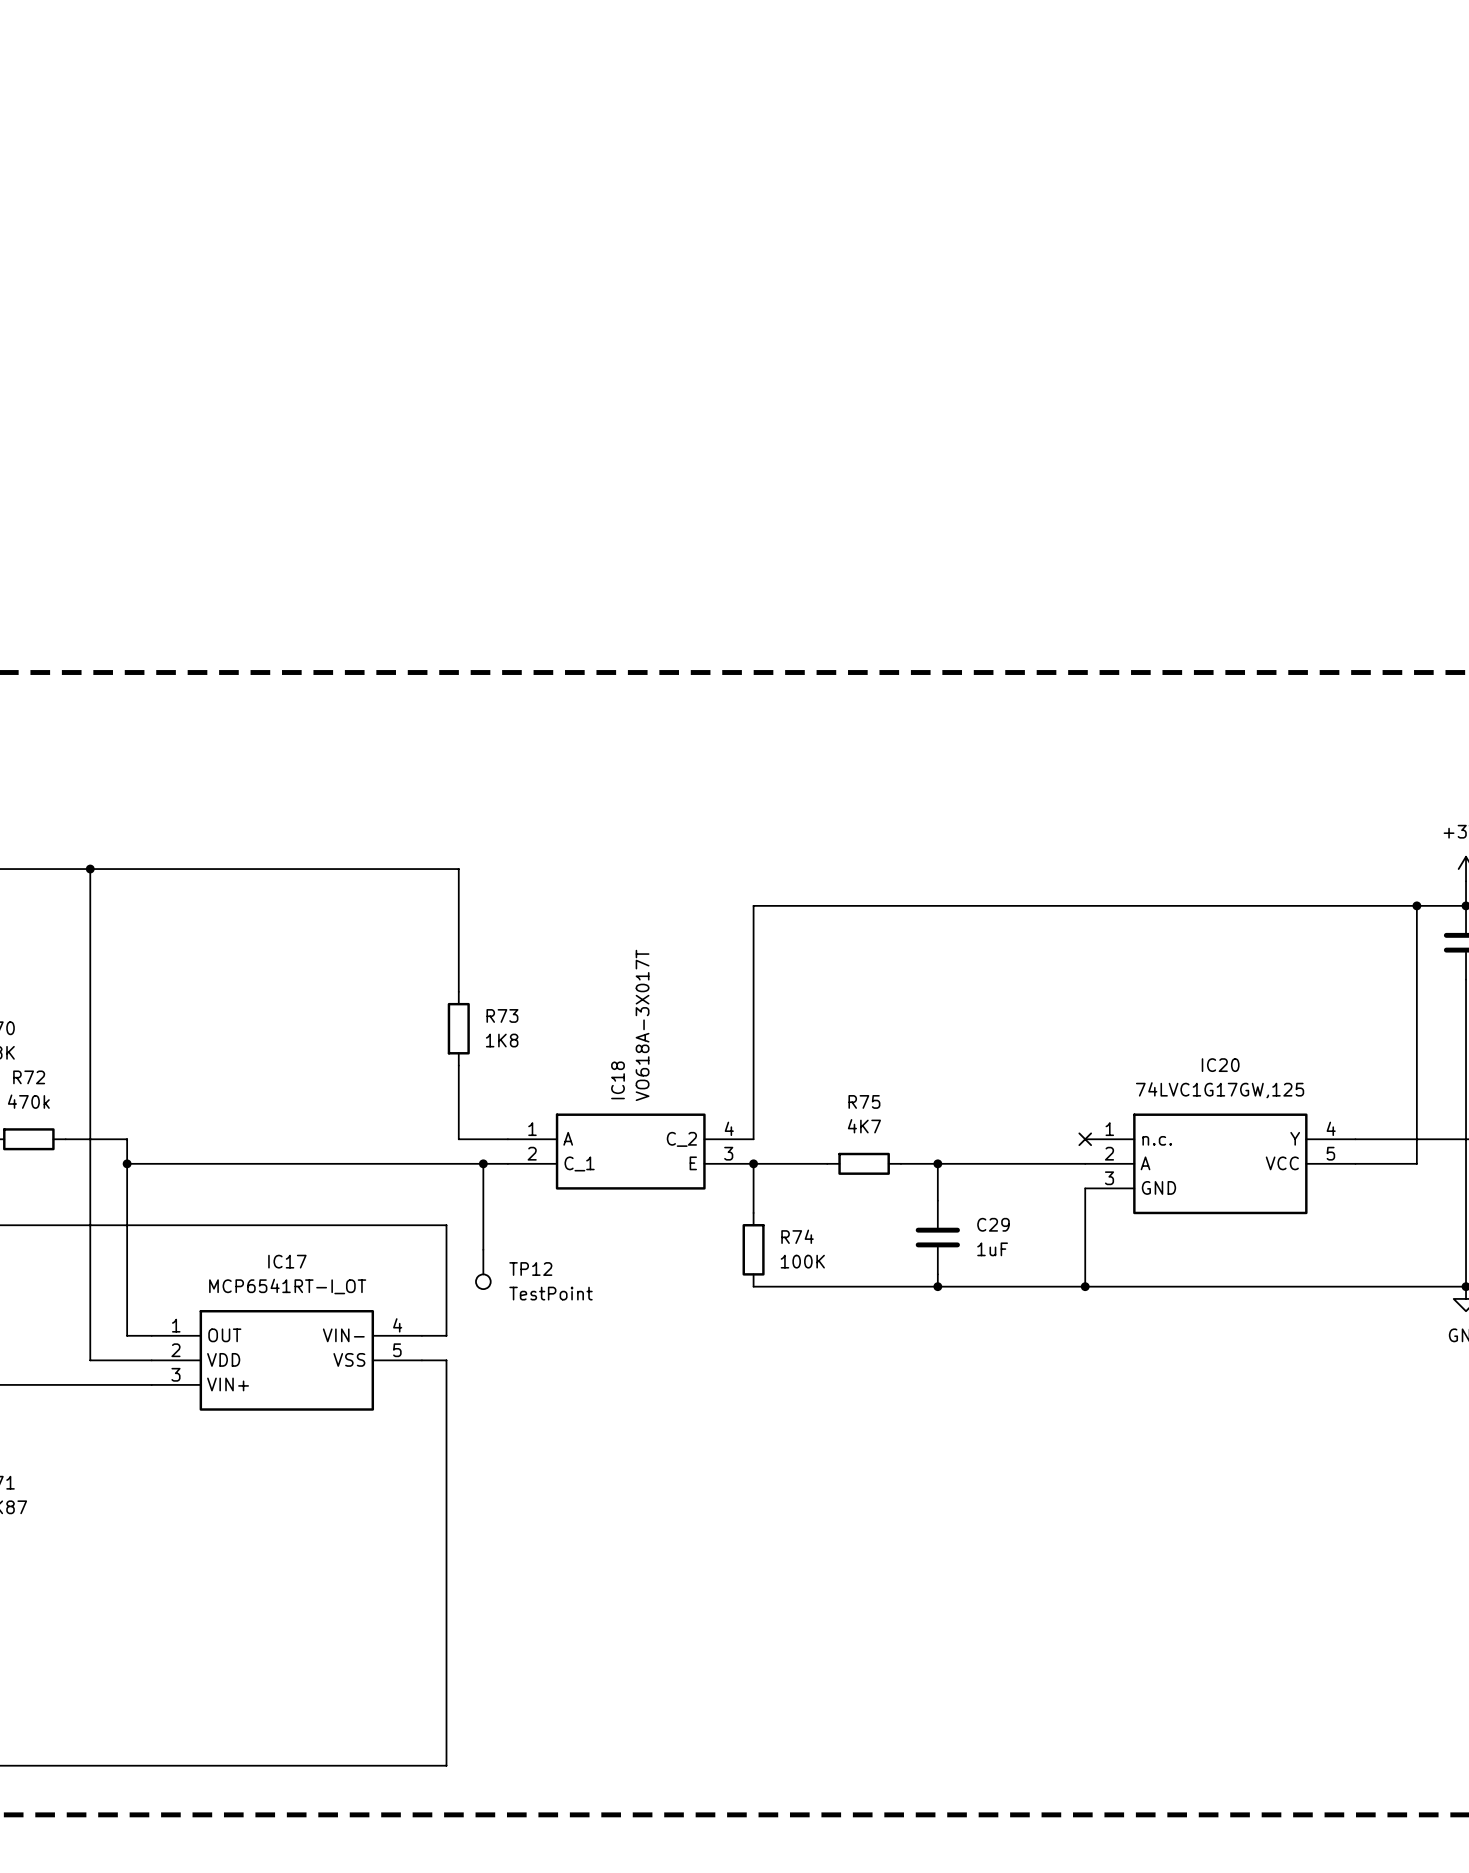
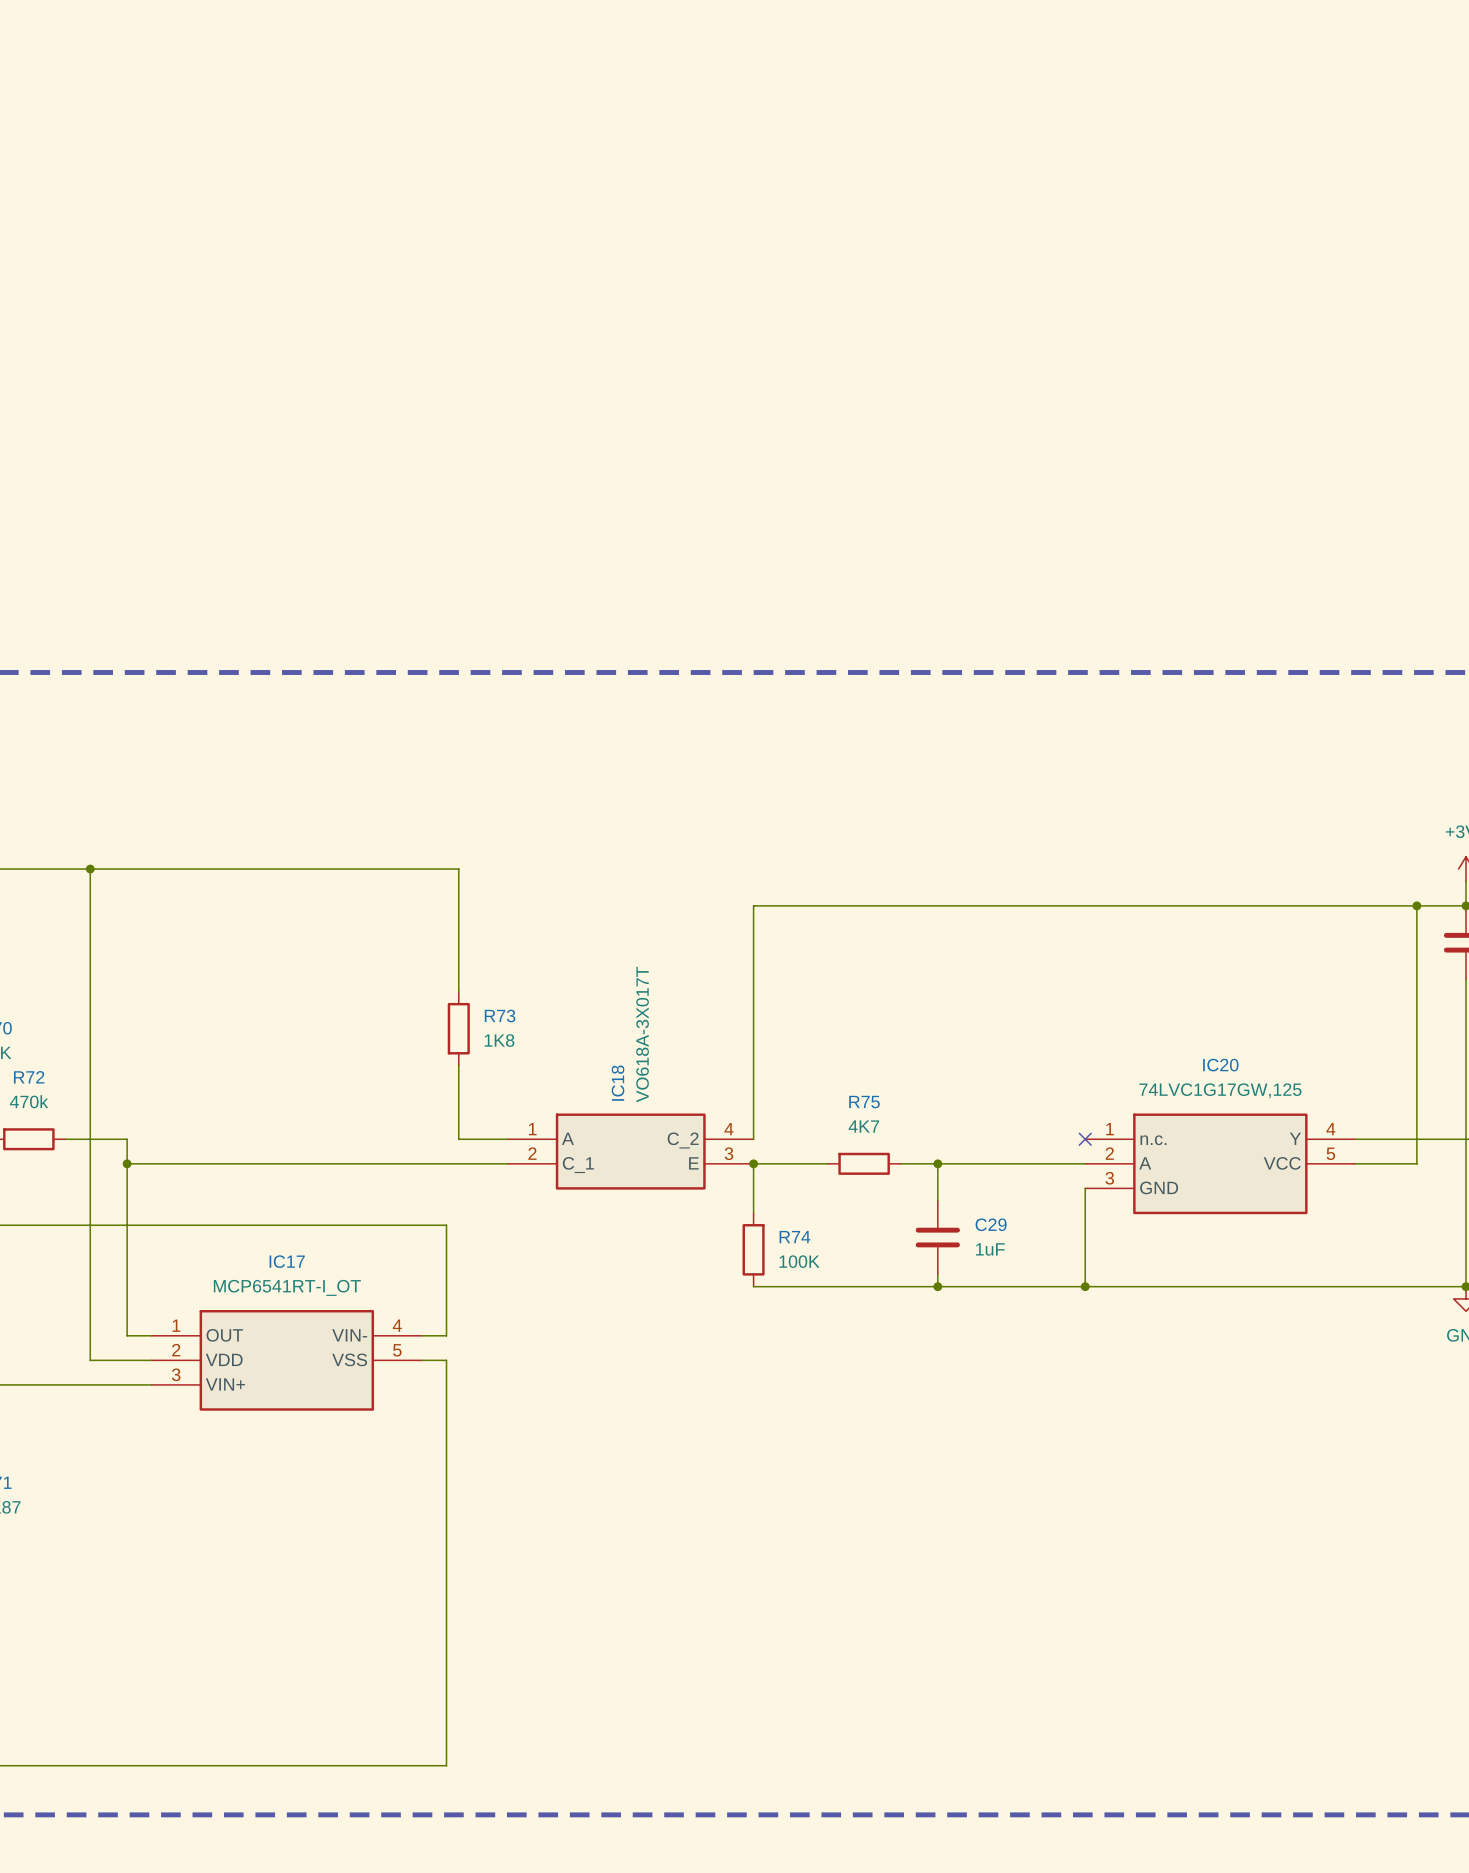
wire: (483, 1163) (483, 1249) -> none
junction: (483, 1163) -> none
TP12: TestPoint (483, 1269) -> none

